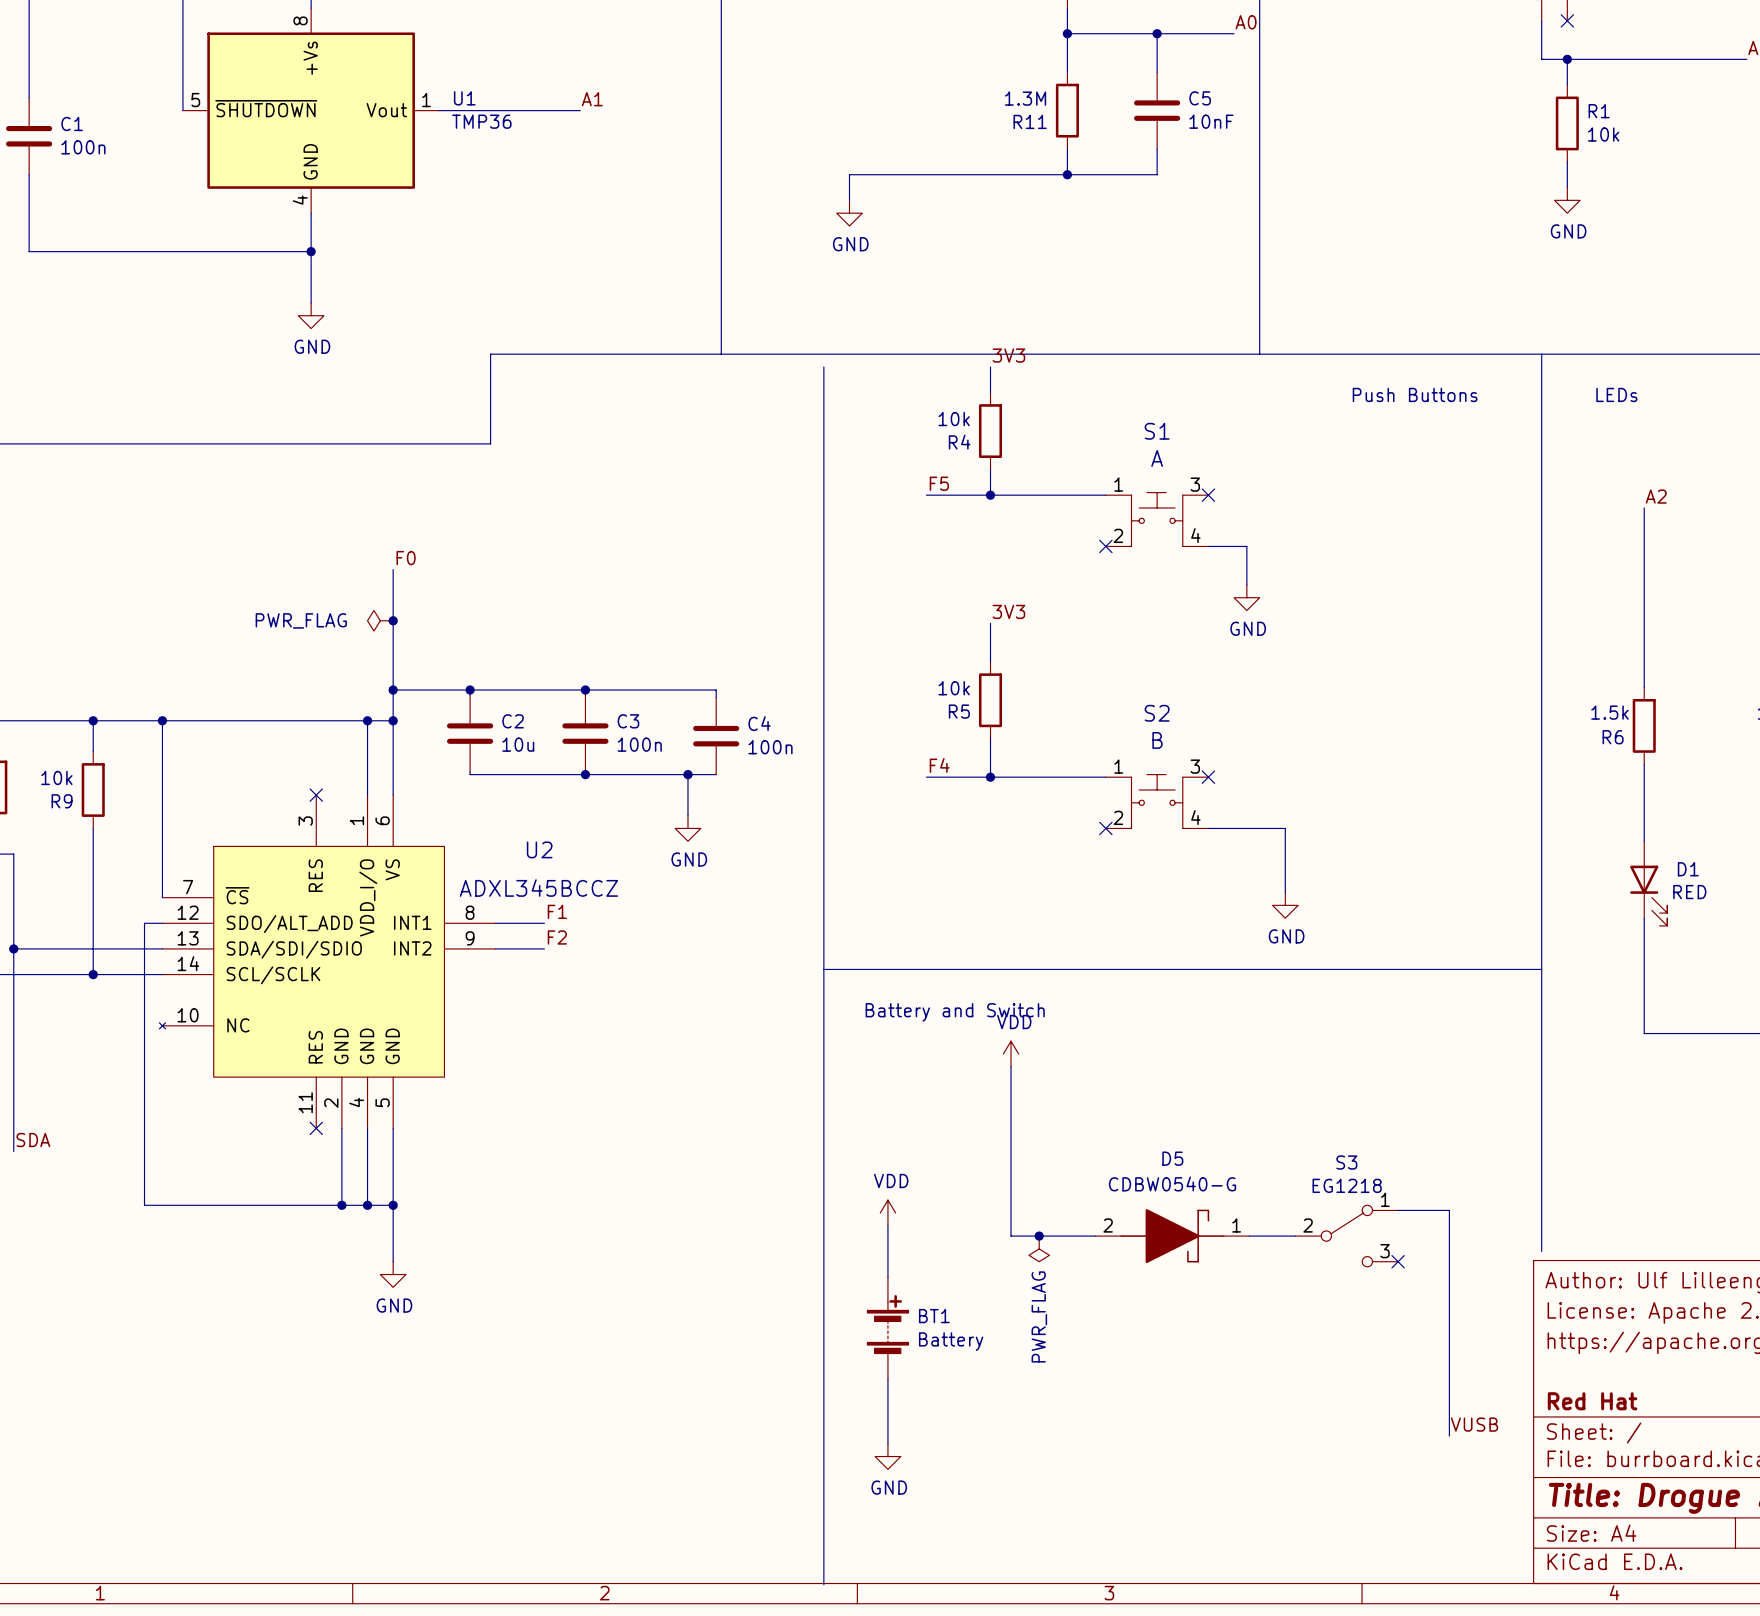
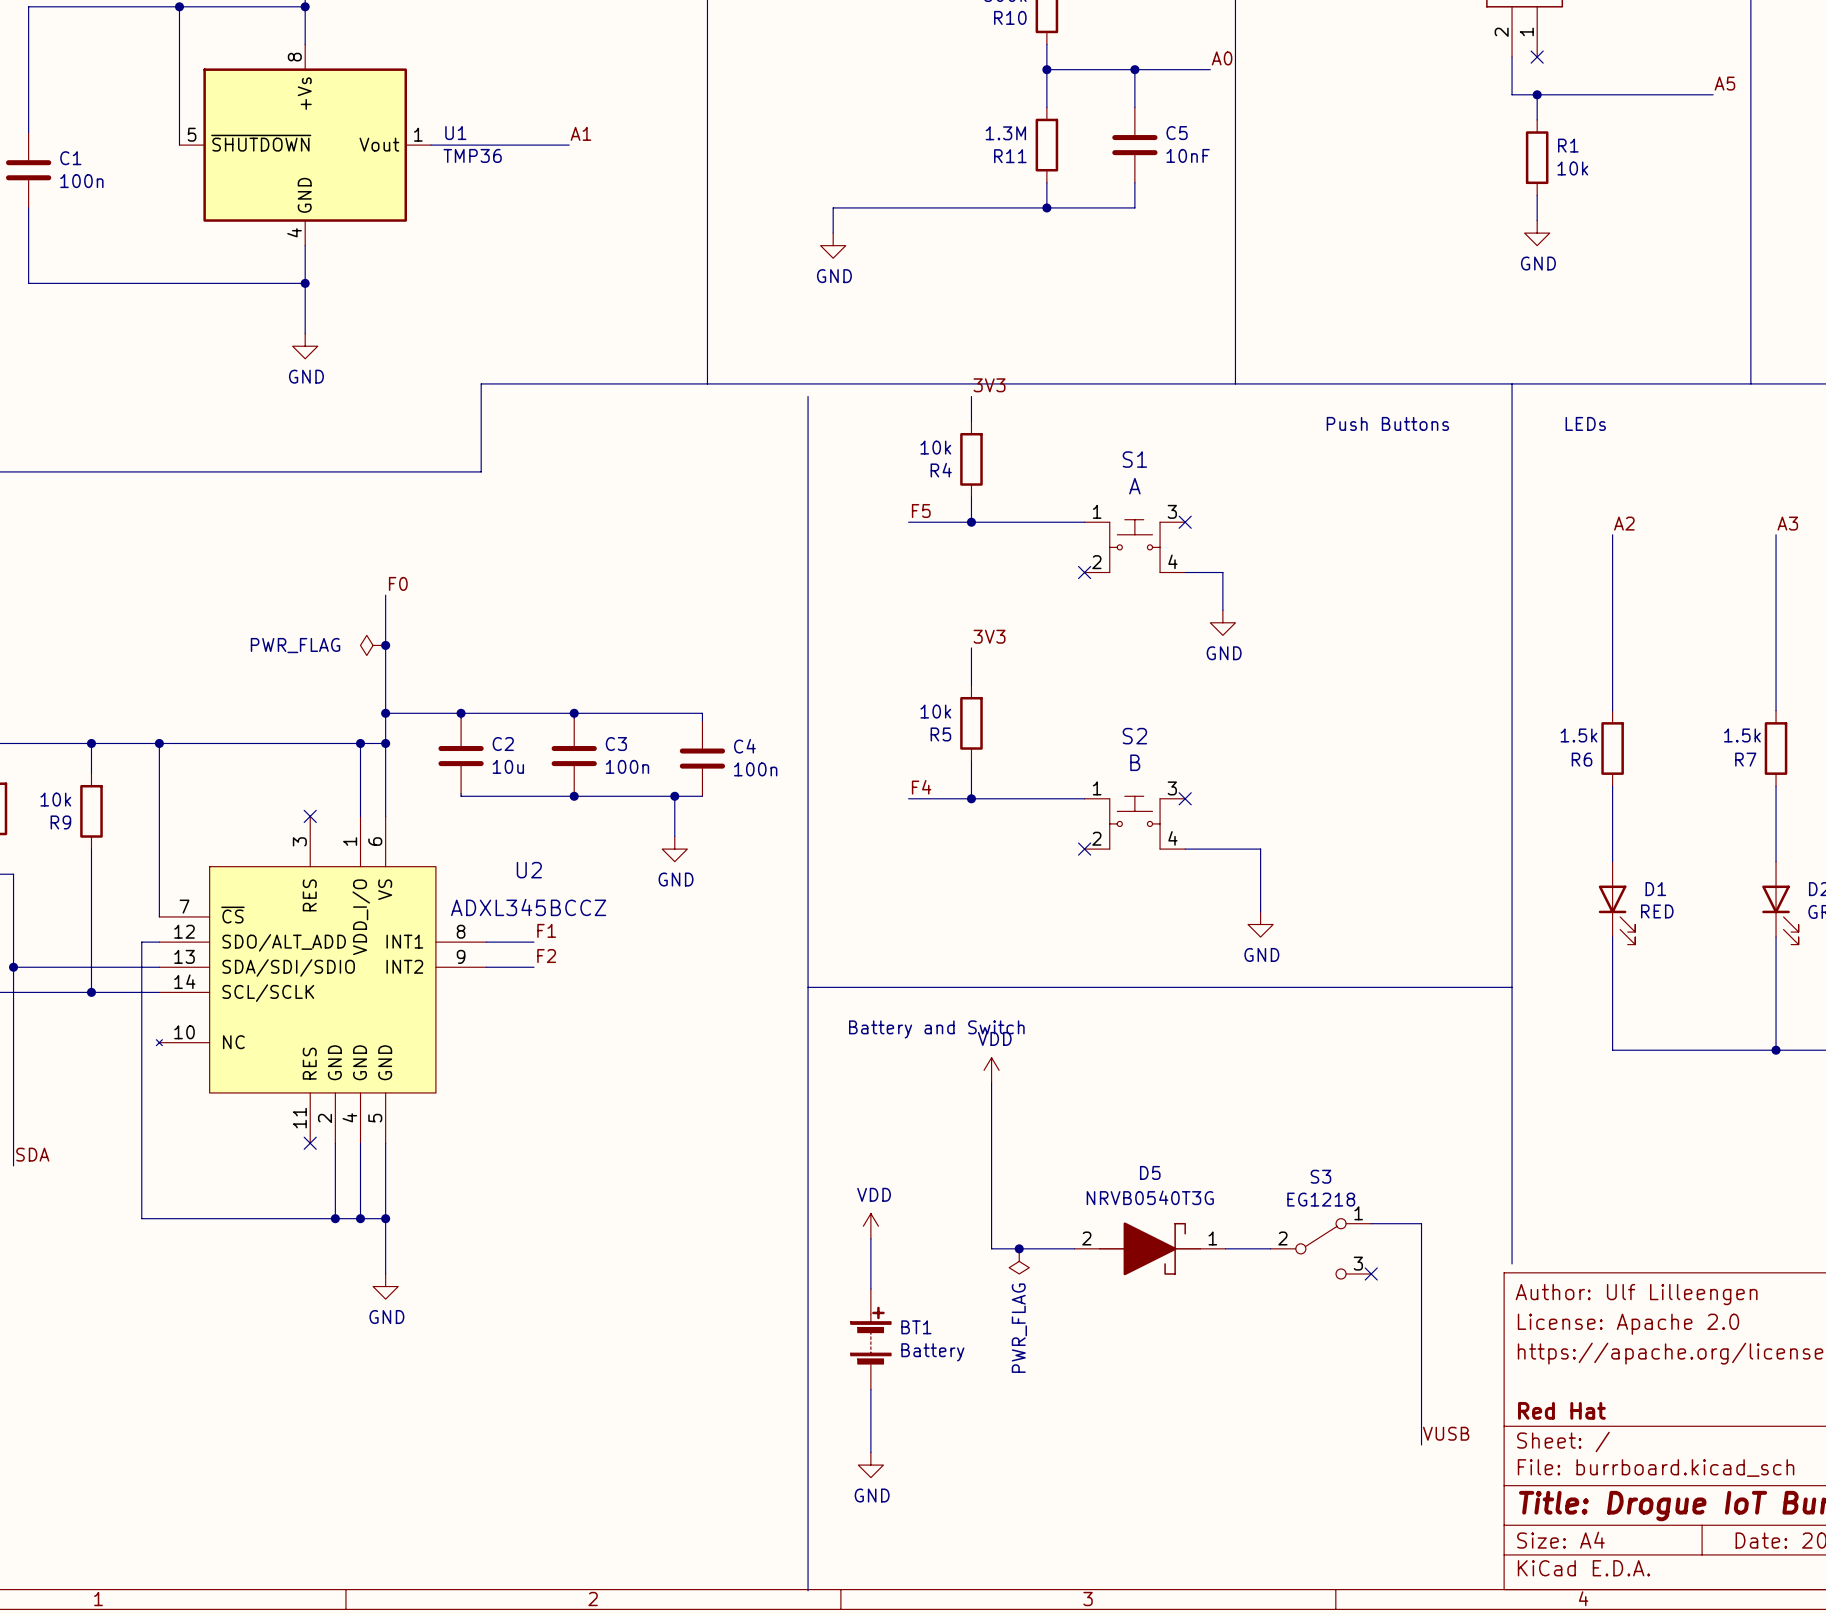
D5 value: CDBW0540-G (1172, 1184) -> NRVB0540T3G (1150, 1197)

